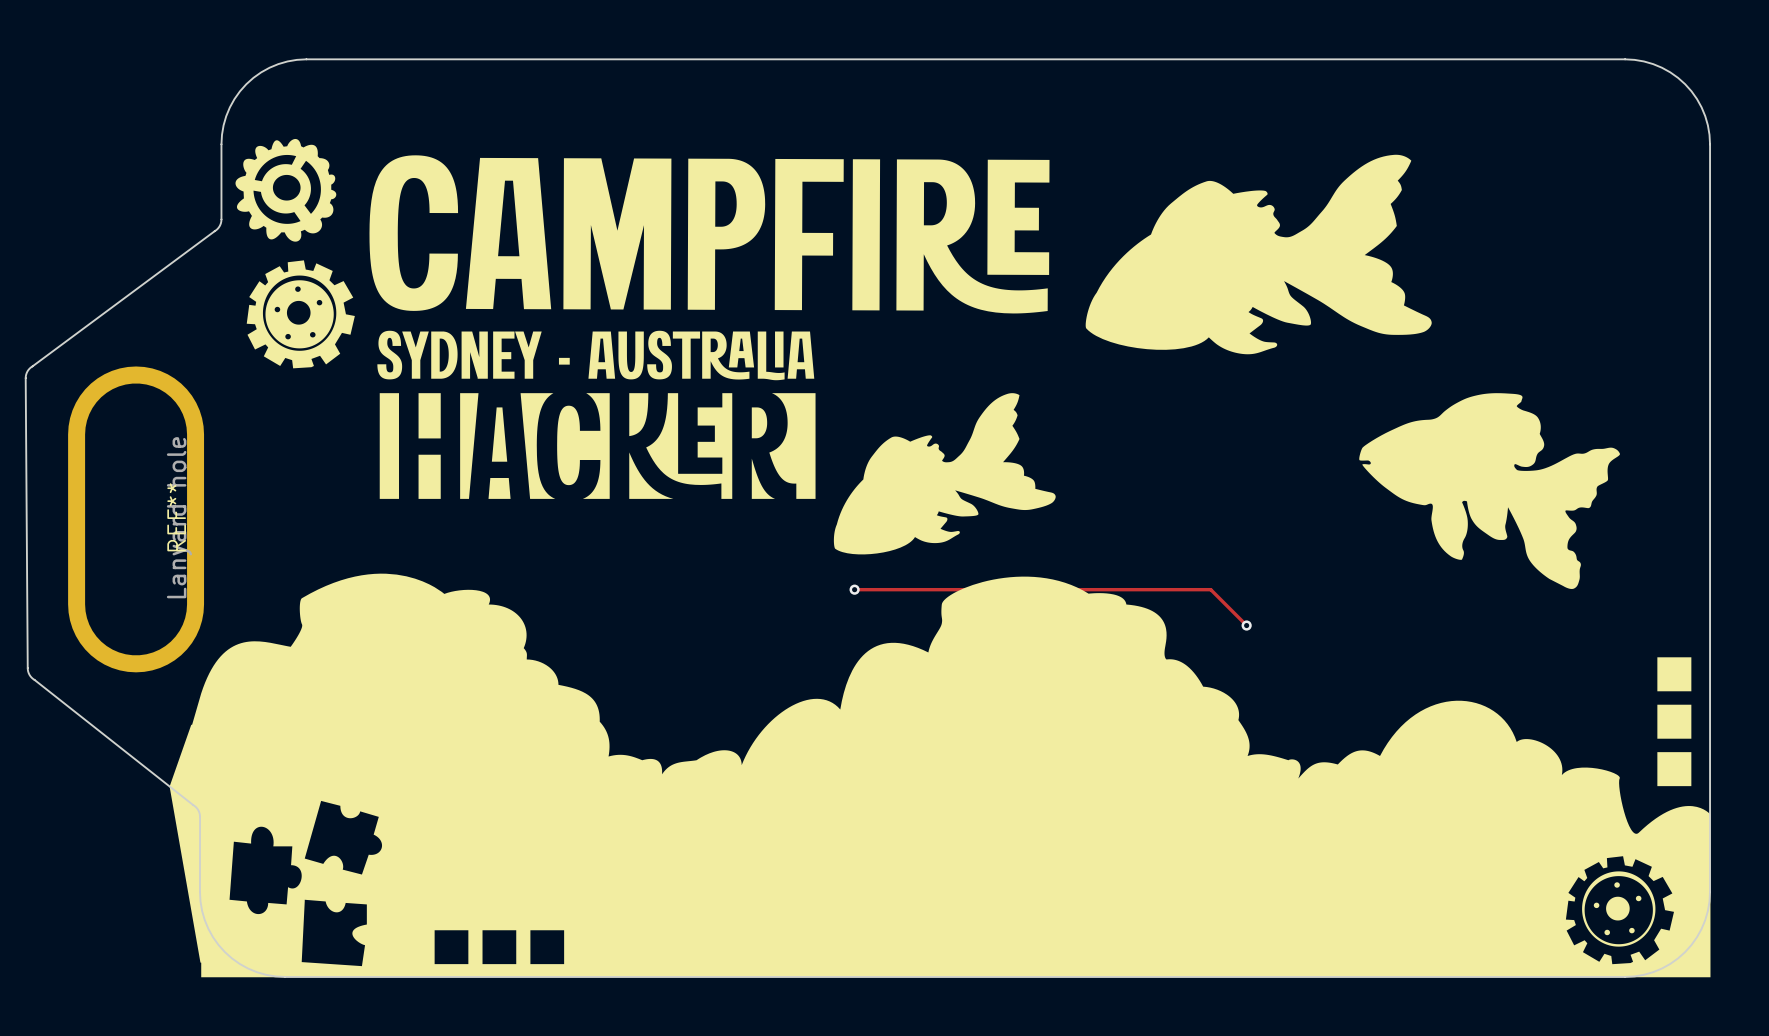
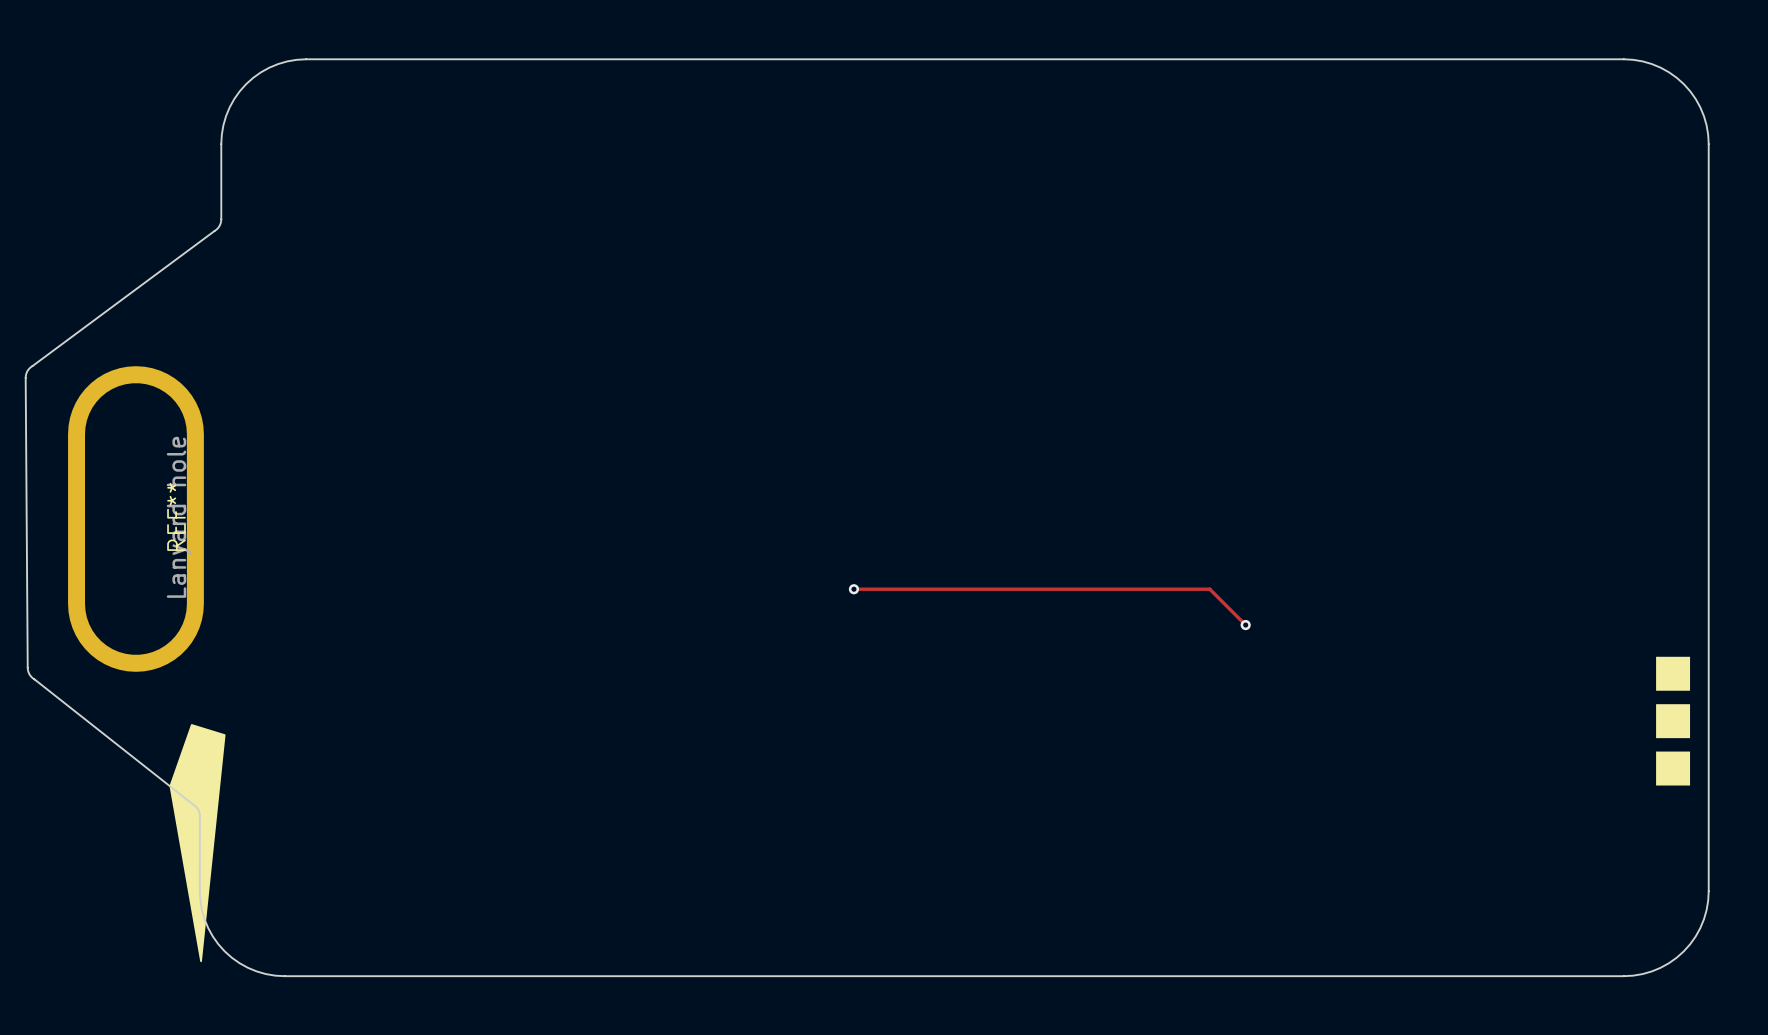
drawing: [191, 138, 1711, 978] -> none
drawing: [1085, 154, 1432, 355] -> none

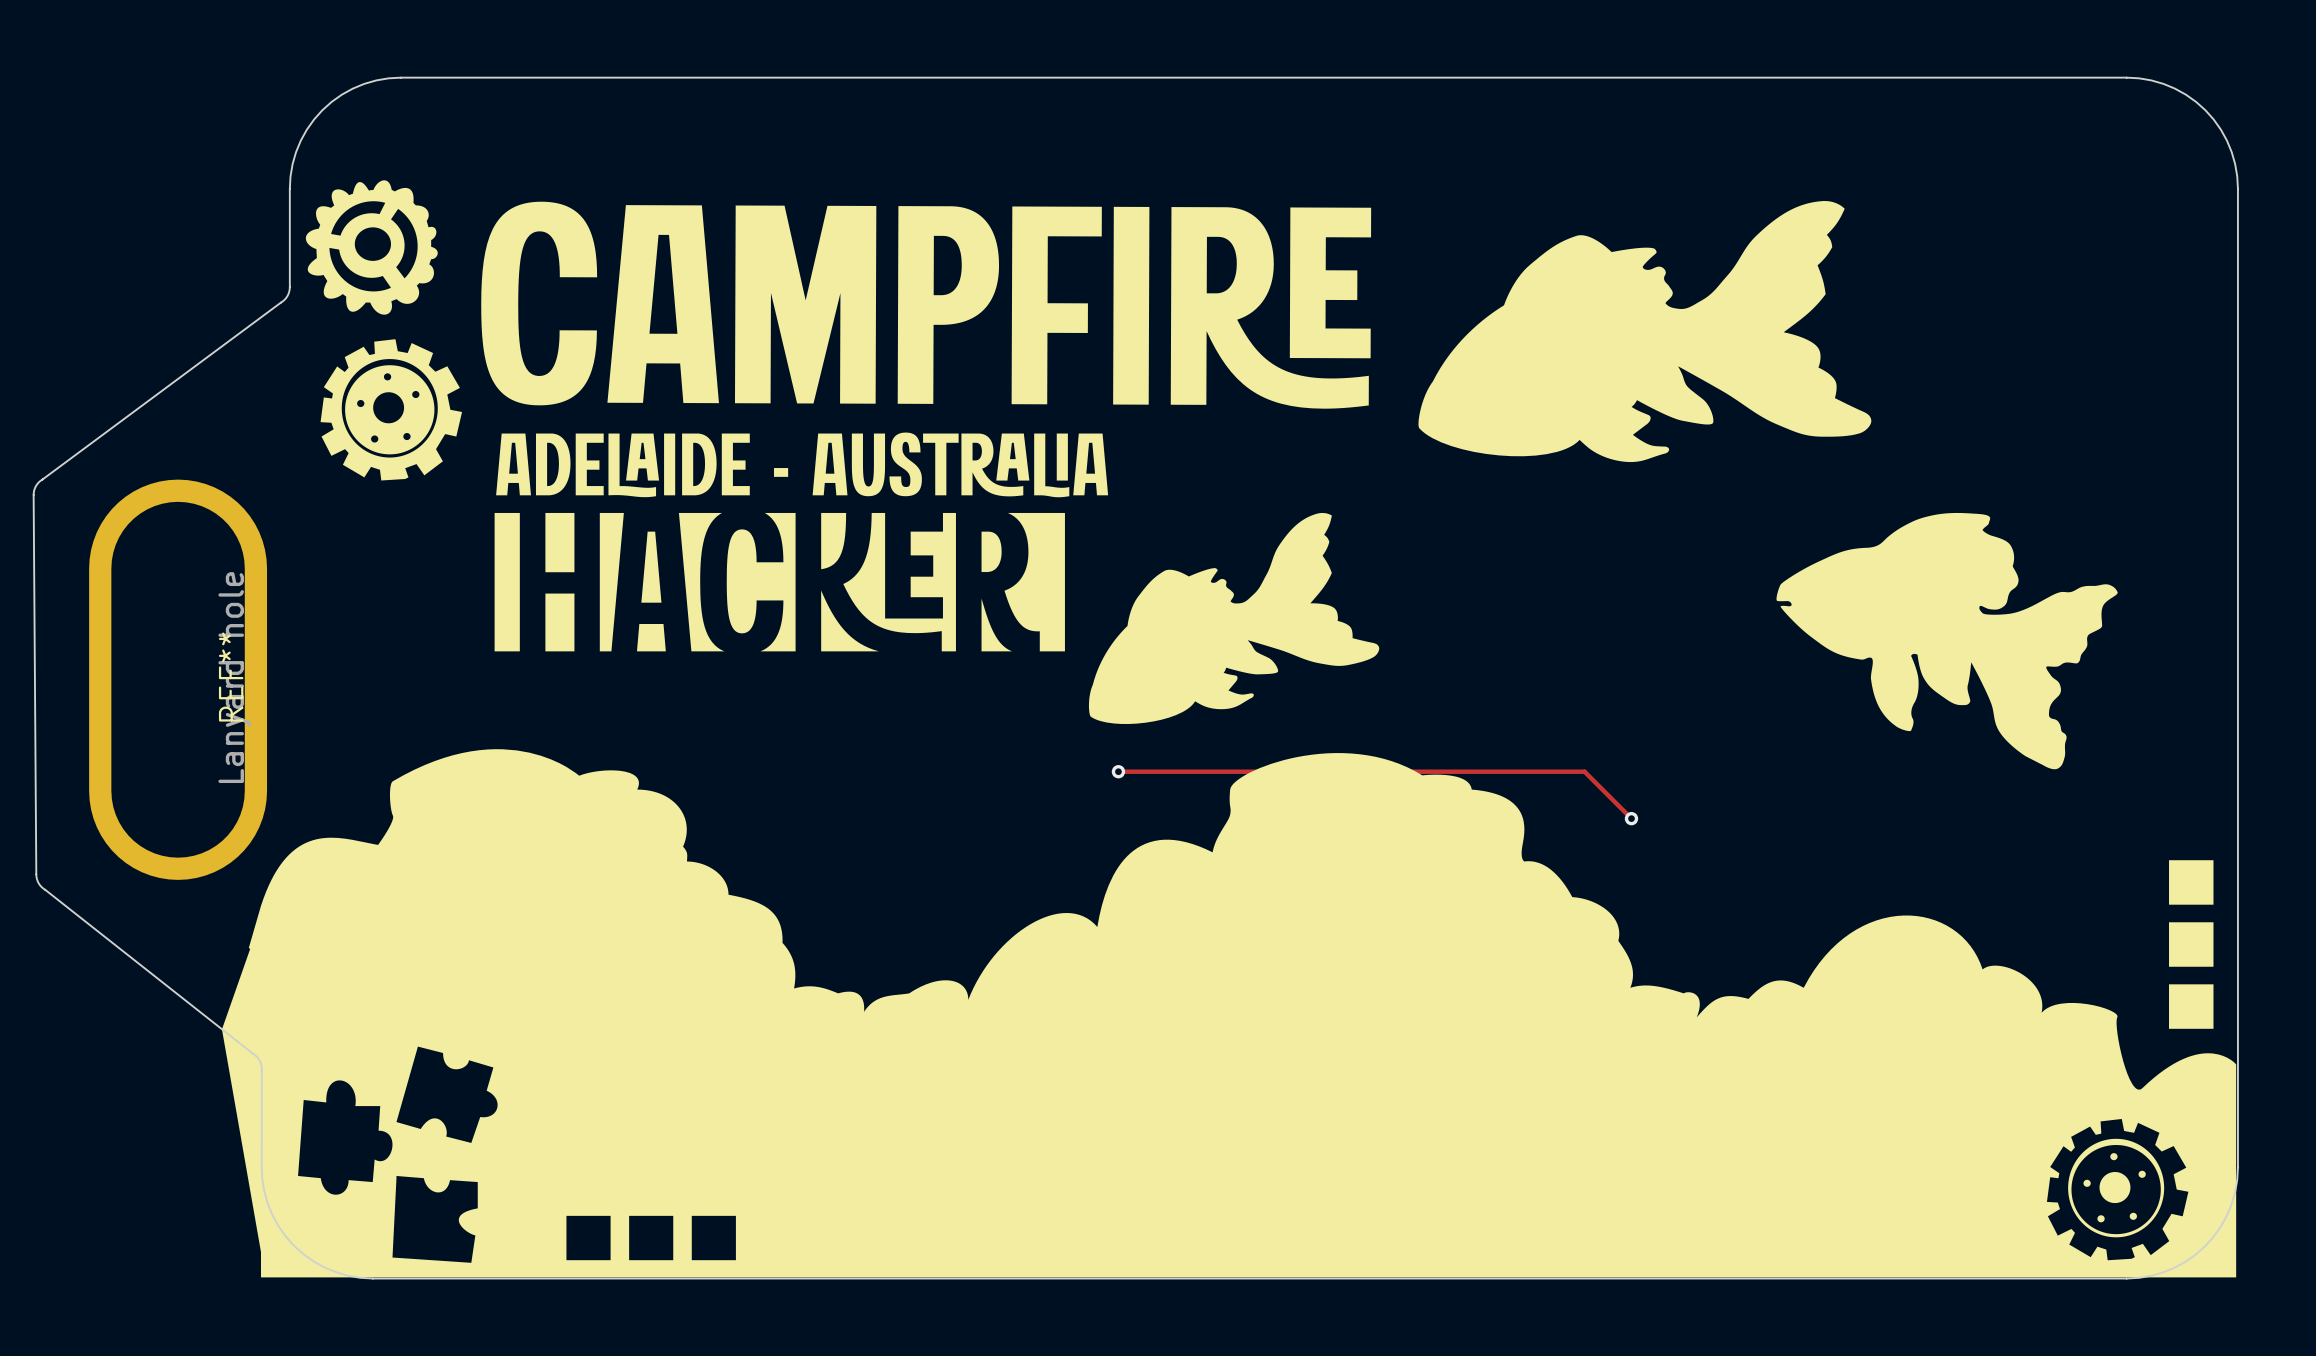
drawing: none -> [305, 180, 1372, 481]
drawing: none -> [1418, 201, 1872, 463]
drawing: none -> [248, 432, 2237, 1278]

